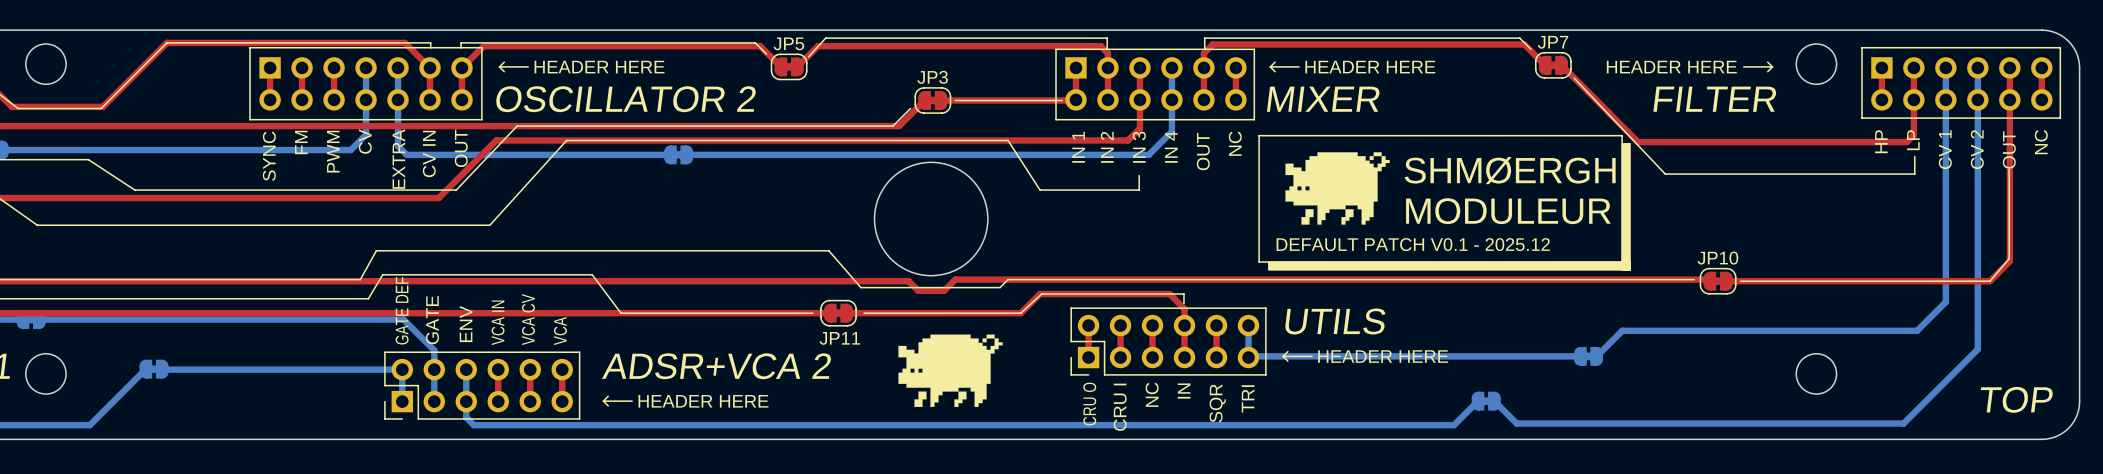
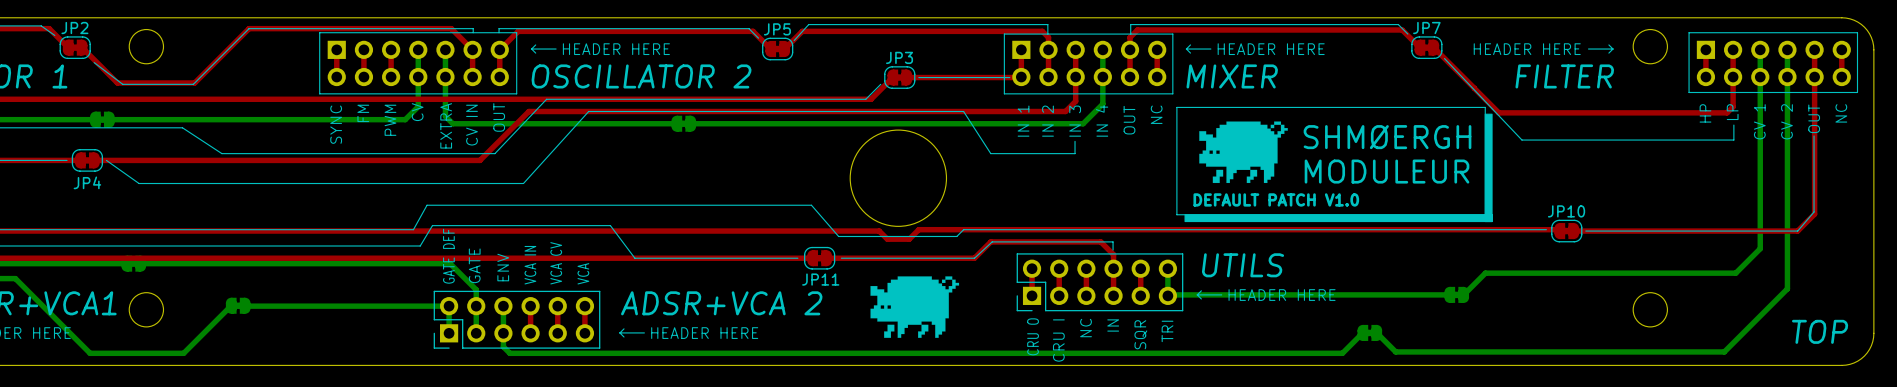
text: DEFAULT PATCH V0.1 - 2025.12 (1413, 244) -> DEFAULT PATCH V1.0 (1276, 199)

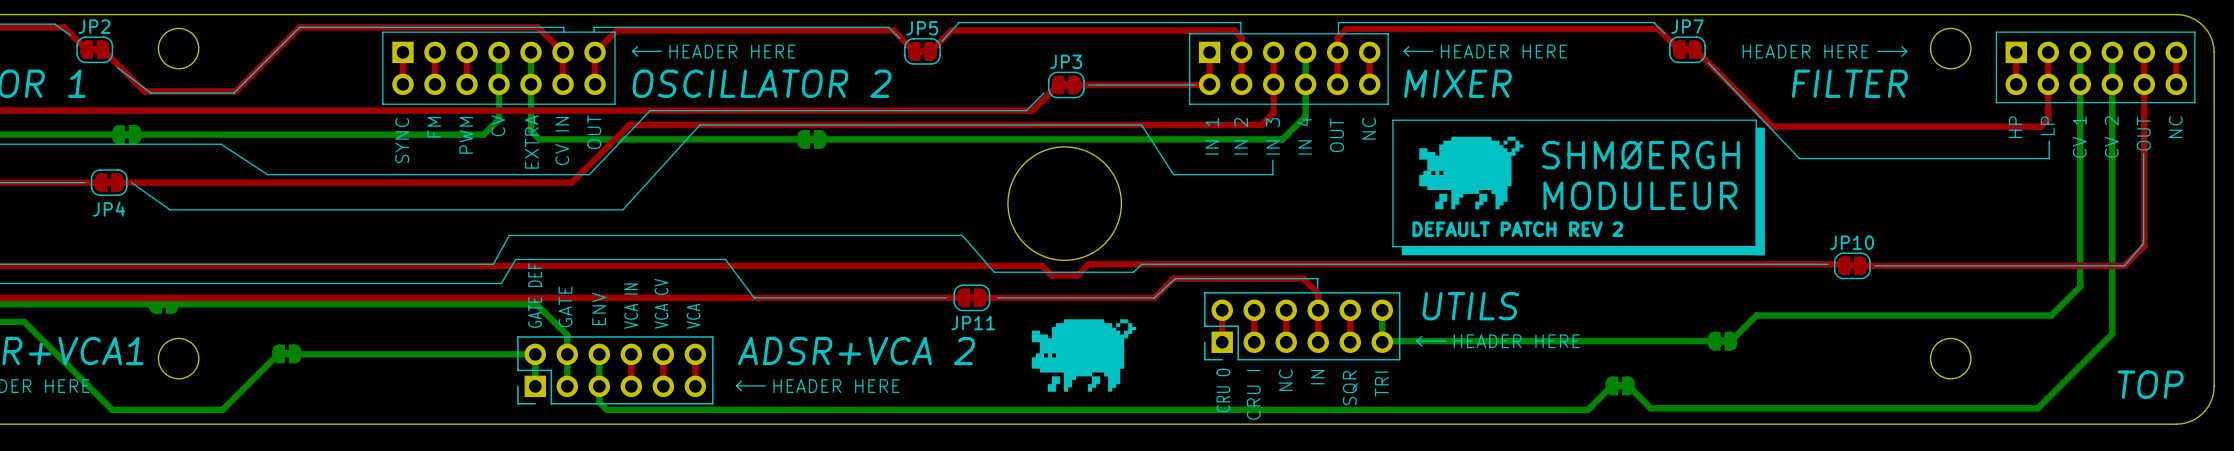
text: DEFAULT PATCH V1.0 (1276, 199) -> DEFAULT PATCH REV 2 (1517, 229)

